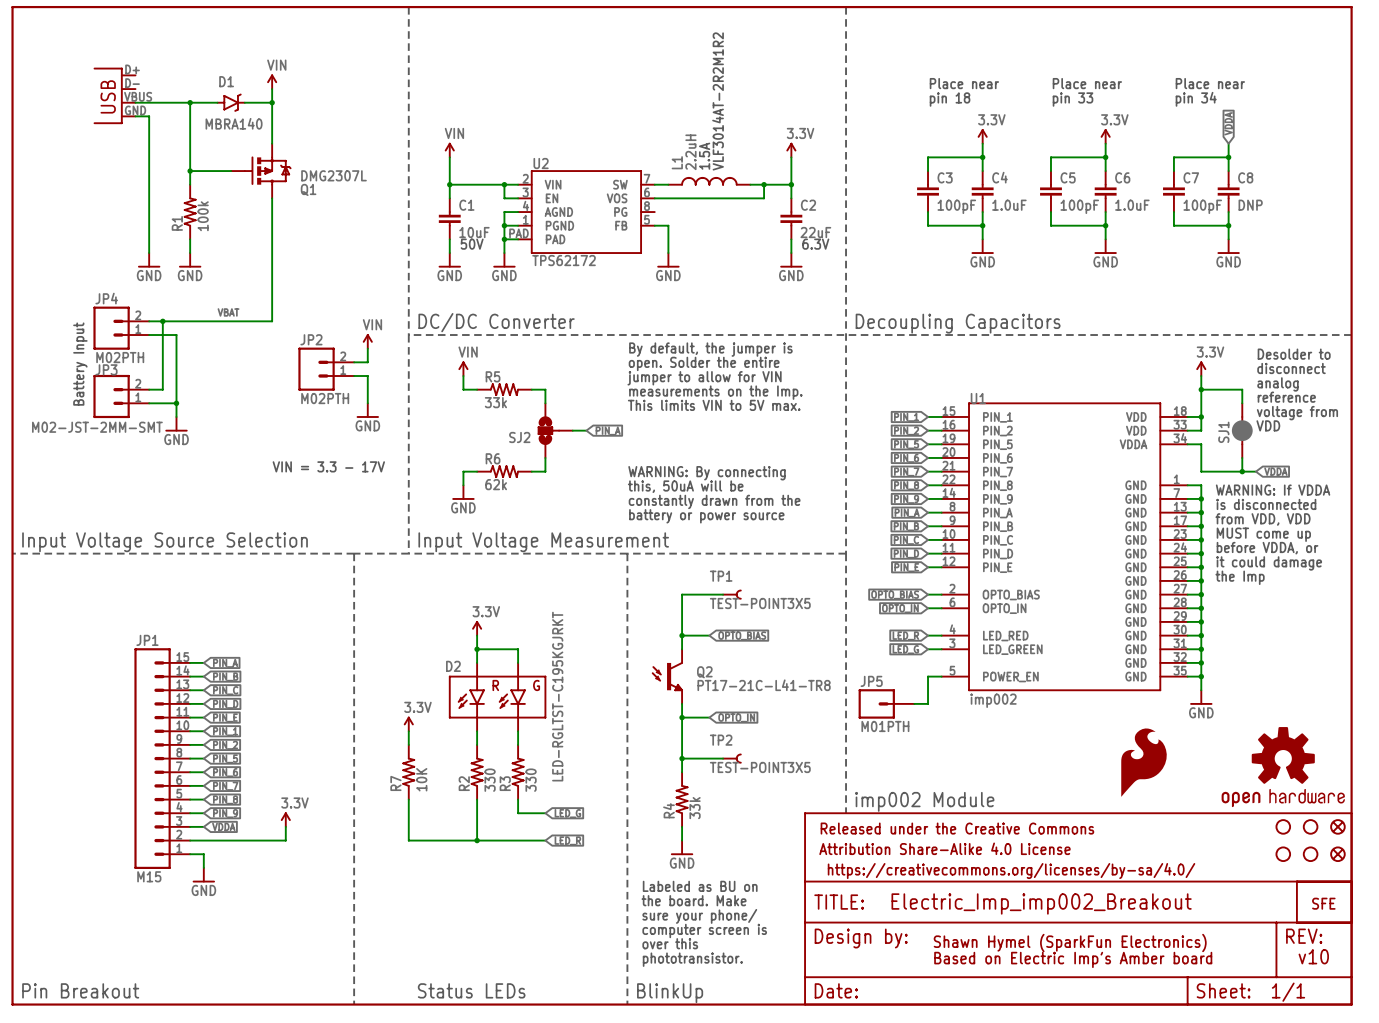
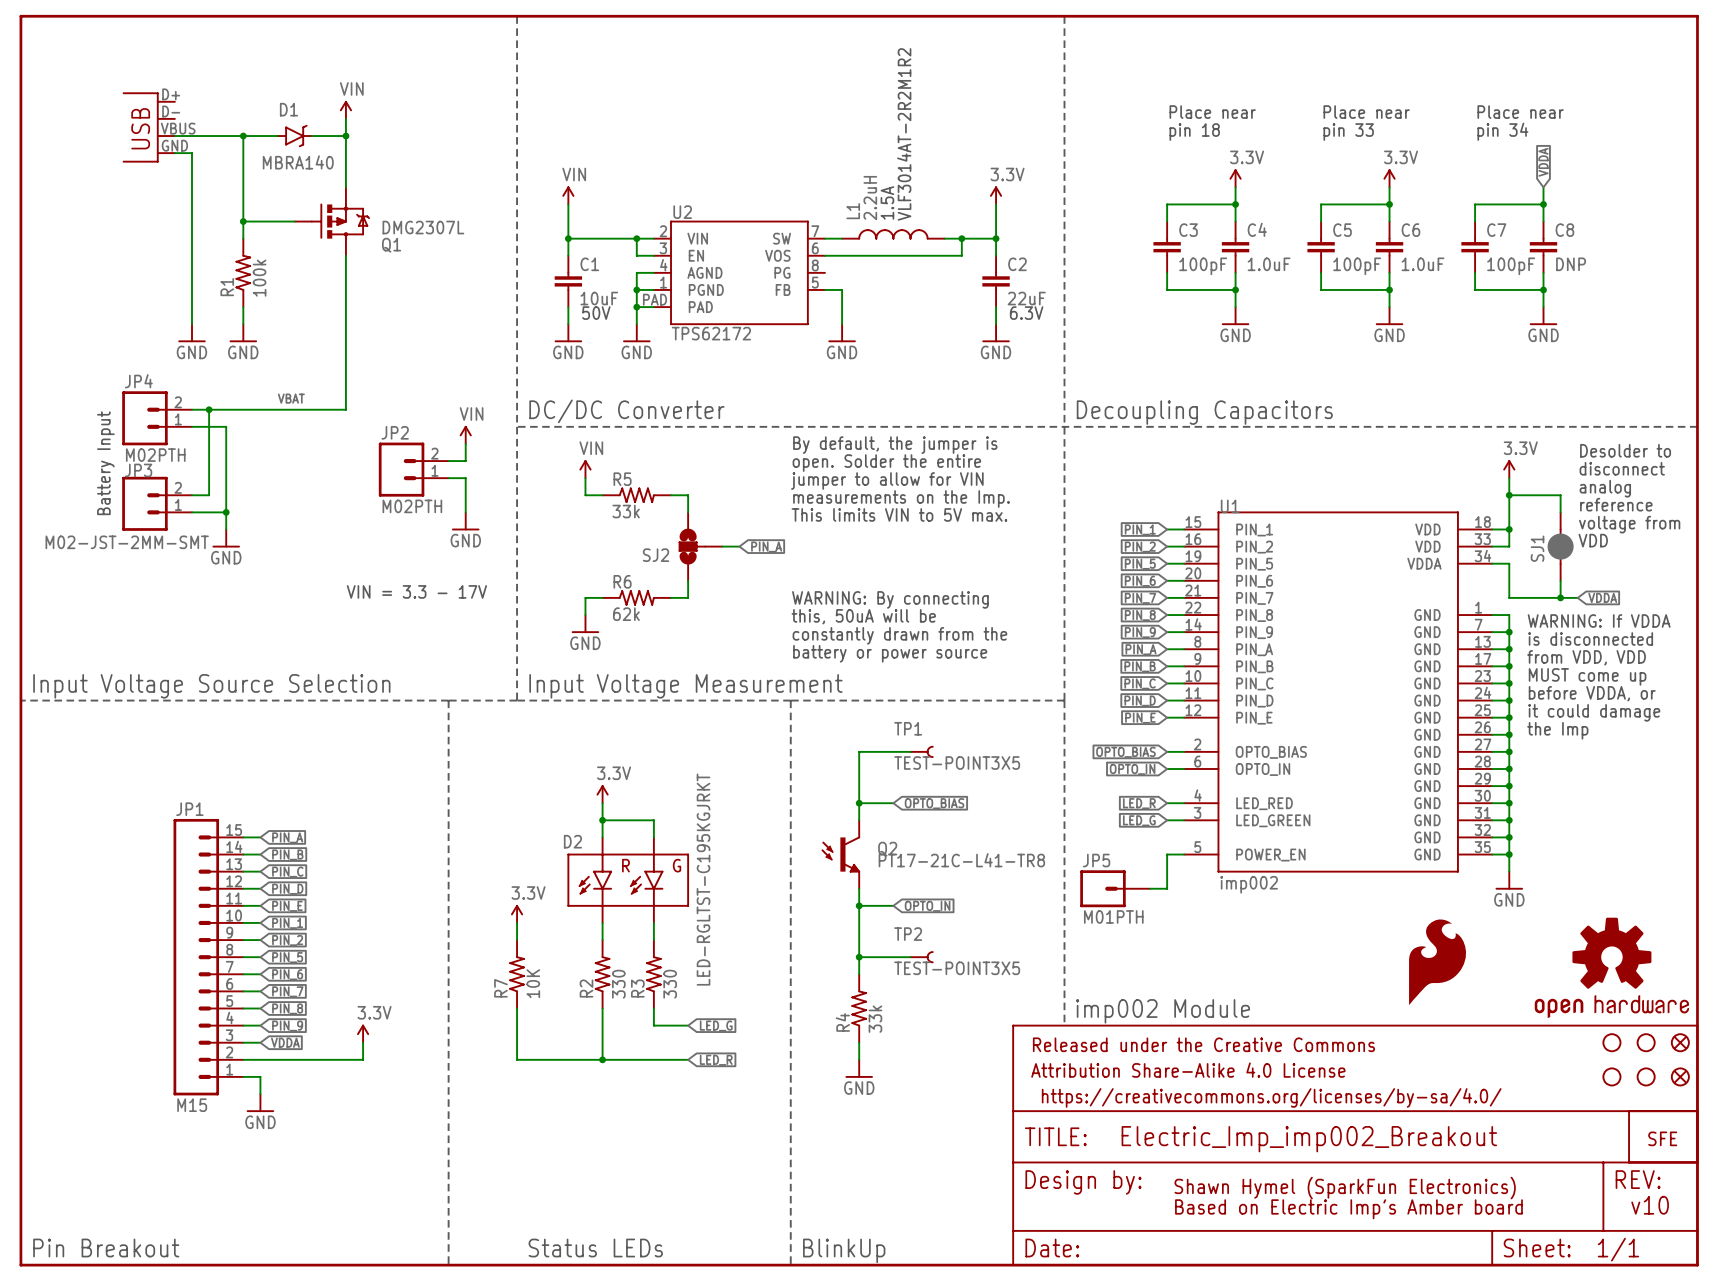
Q2 text: none -> PT17-21C-L41-TR8 (961, 860)
Q2 value: PT17-21C-L41-TR8 (764, 685) -> none
text: Labeled as BU on (700, 886) -> none
text: the board. Make (694, 900) -> none
text: sure your phone/ (699, 916) -> none
text: computer screen is (704, 930) -> none
text: over this (670, 943) -> none
text: phototransistor. (692, 959) -> none

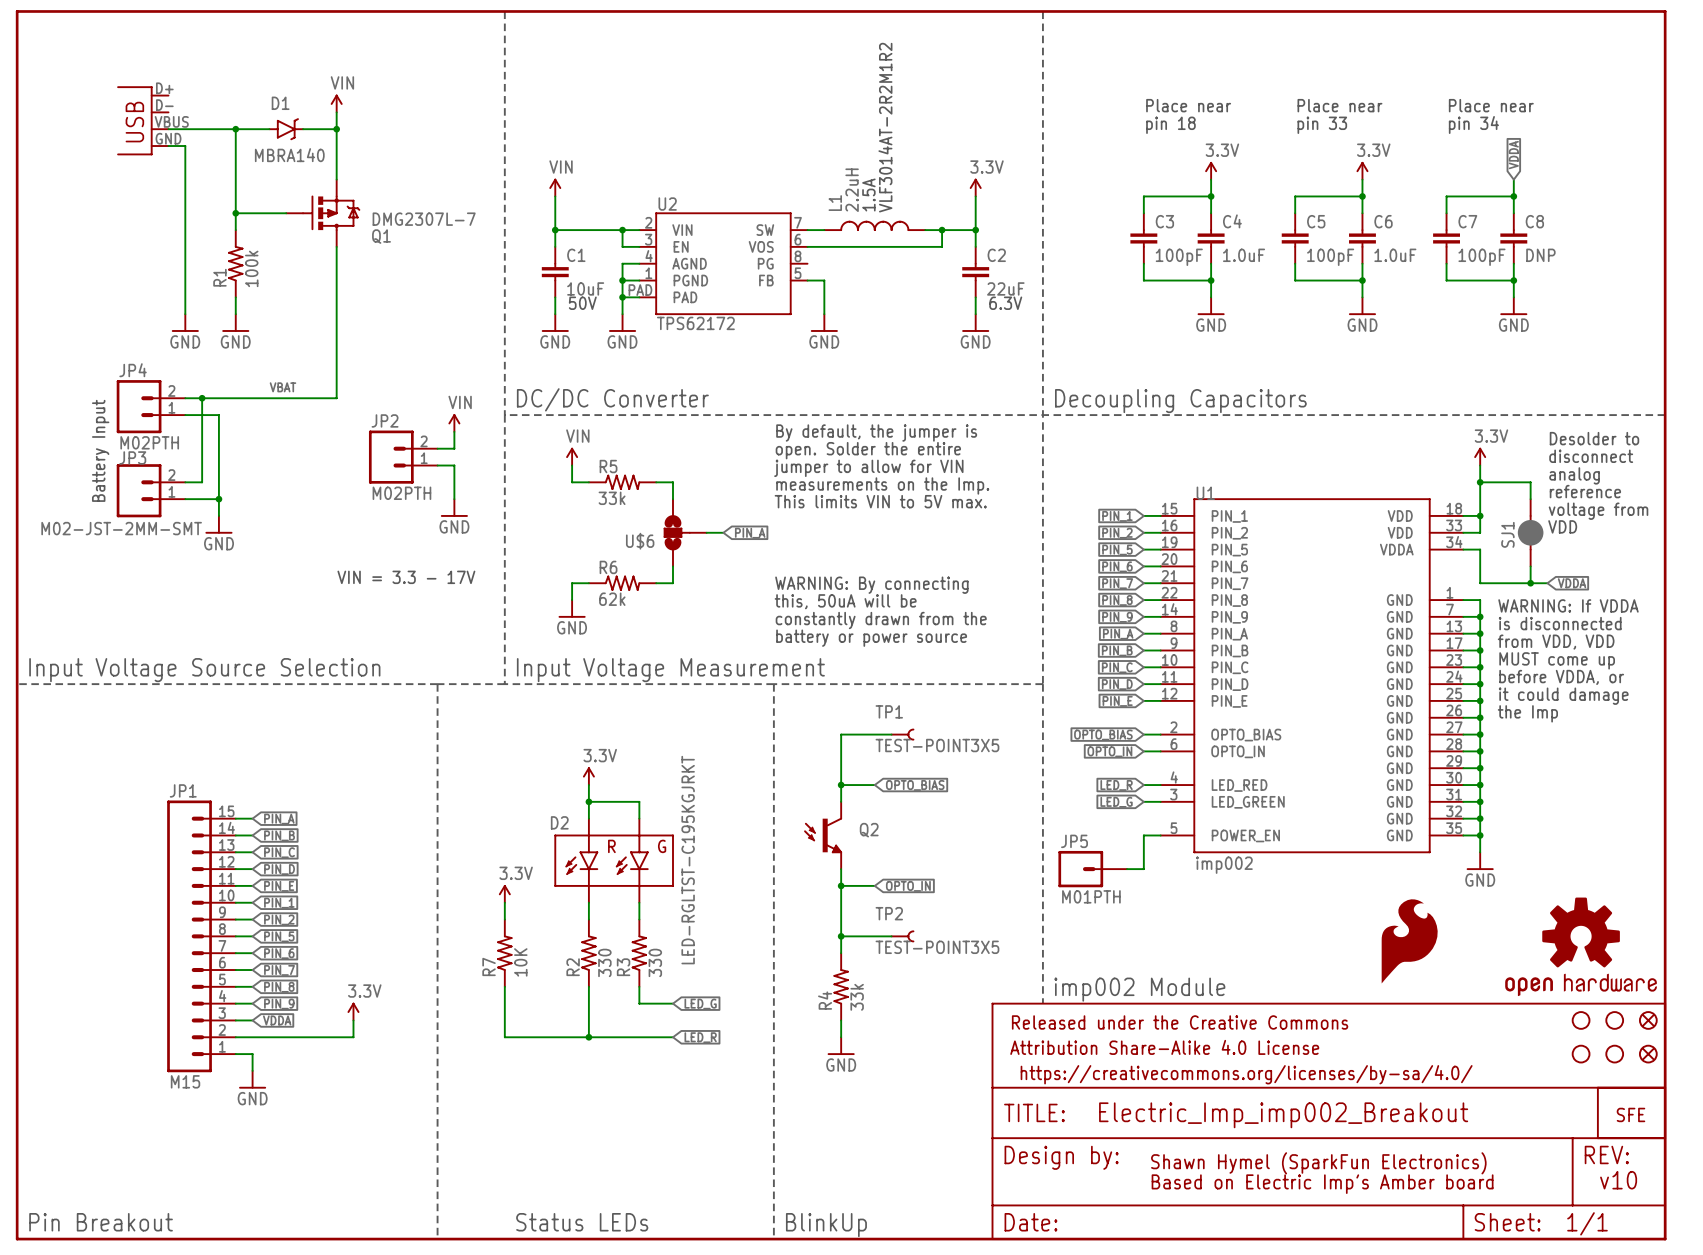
Q1 value: DMG2307L (423, 227) -> DMG2307L-7 (424, 219)
SJ2 name: SJ2 (656, 555) -> U$6 (640, 541)
Q2 text: PT17-21C-L41-TR8 (961, 860) -> none

